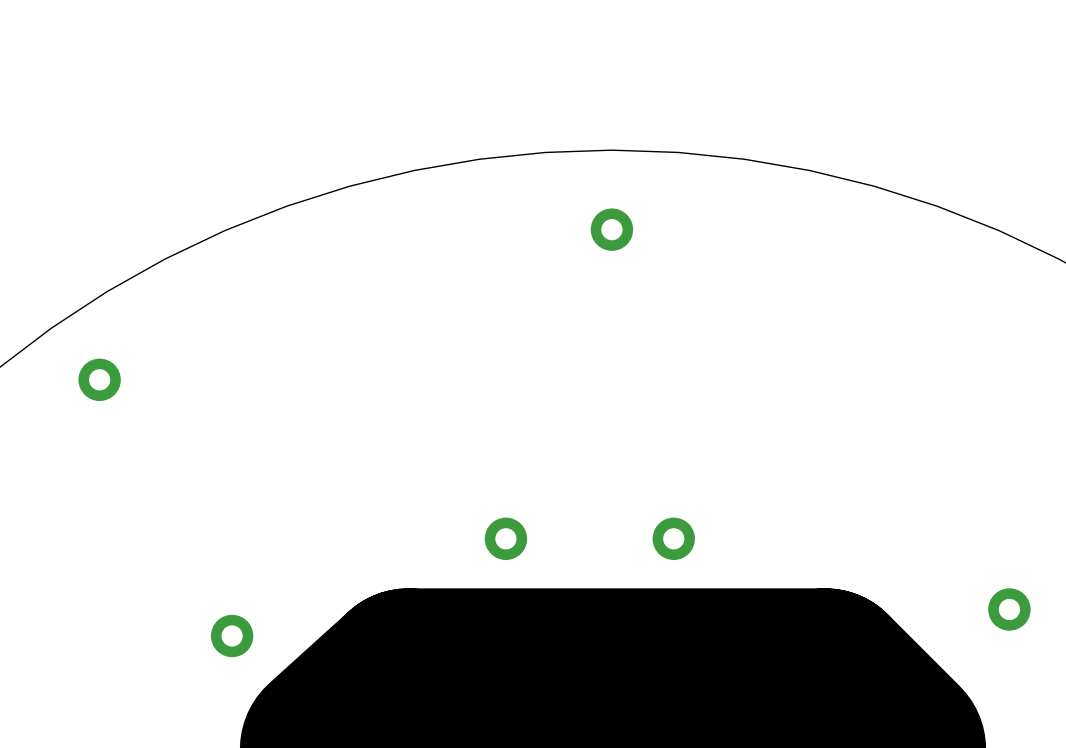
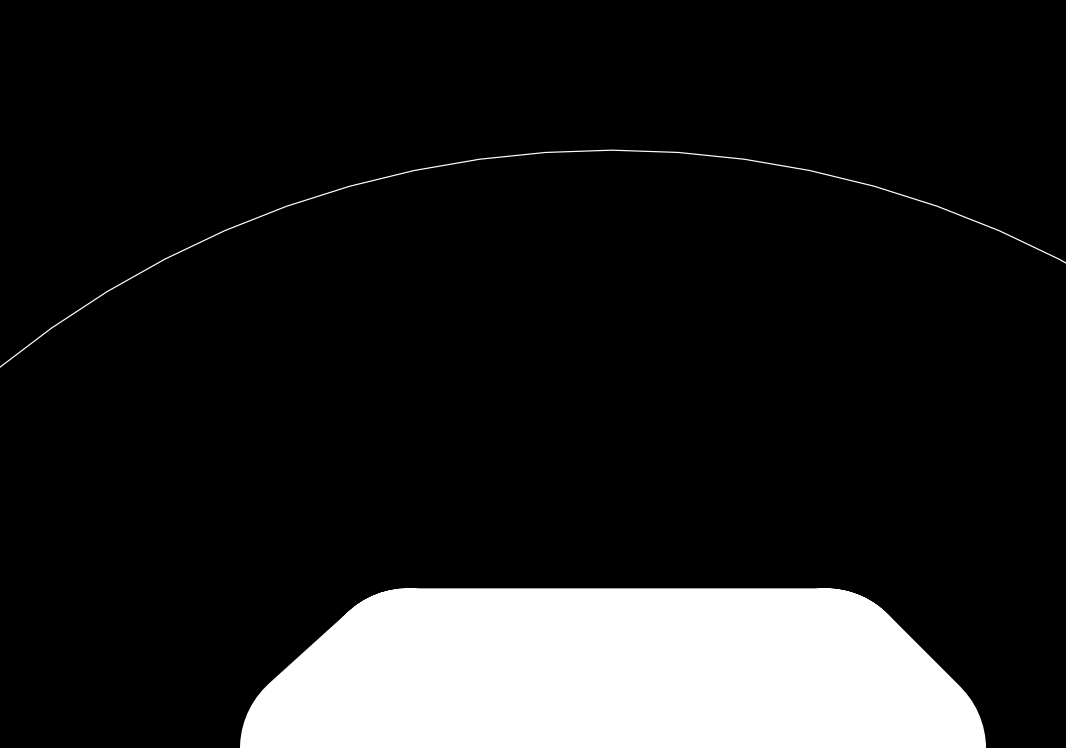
via: (611, 229) -> none
via: (99, 379) -> none
via: (505, 538) -> none
via: (673, 538) -> none
via: (1009, 609) -> none
via: (232, 635) -> none

